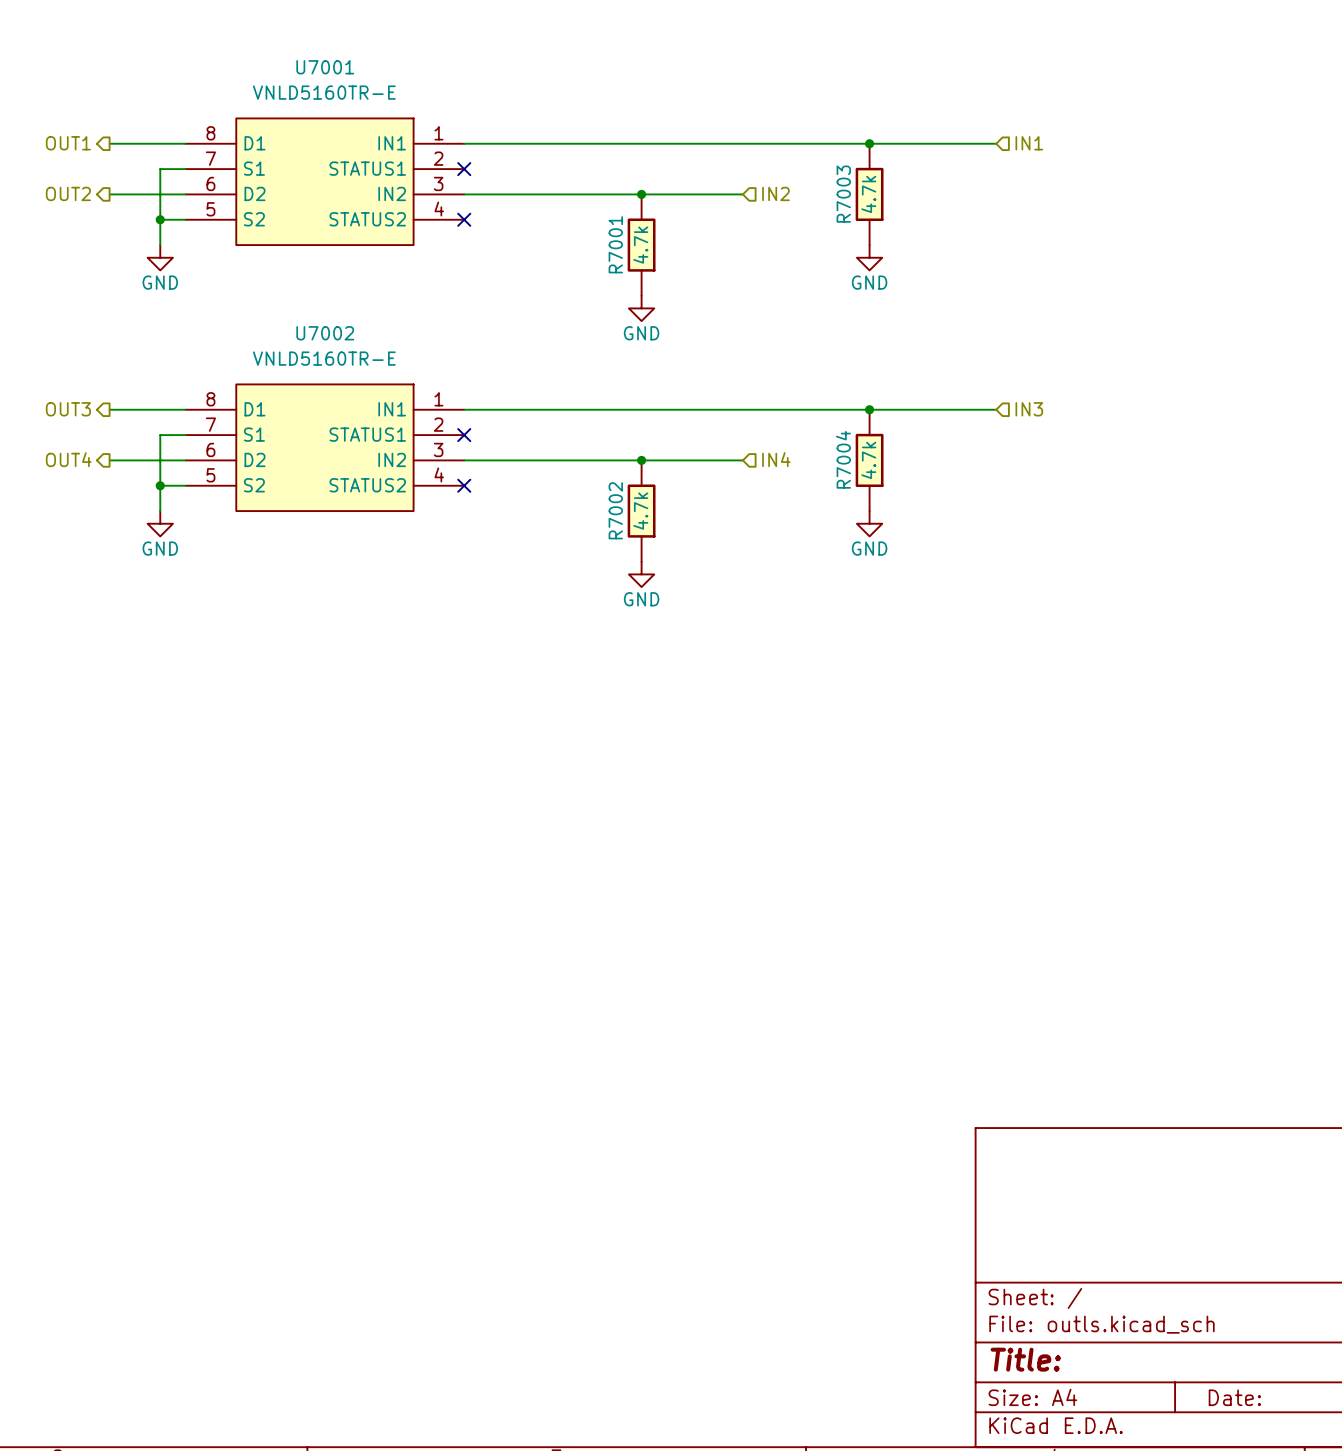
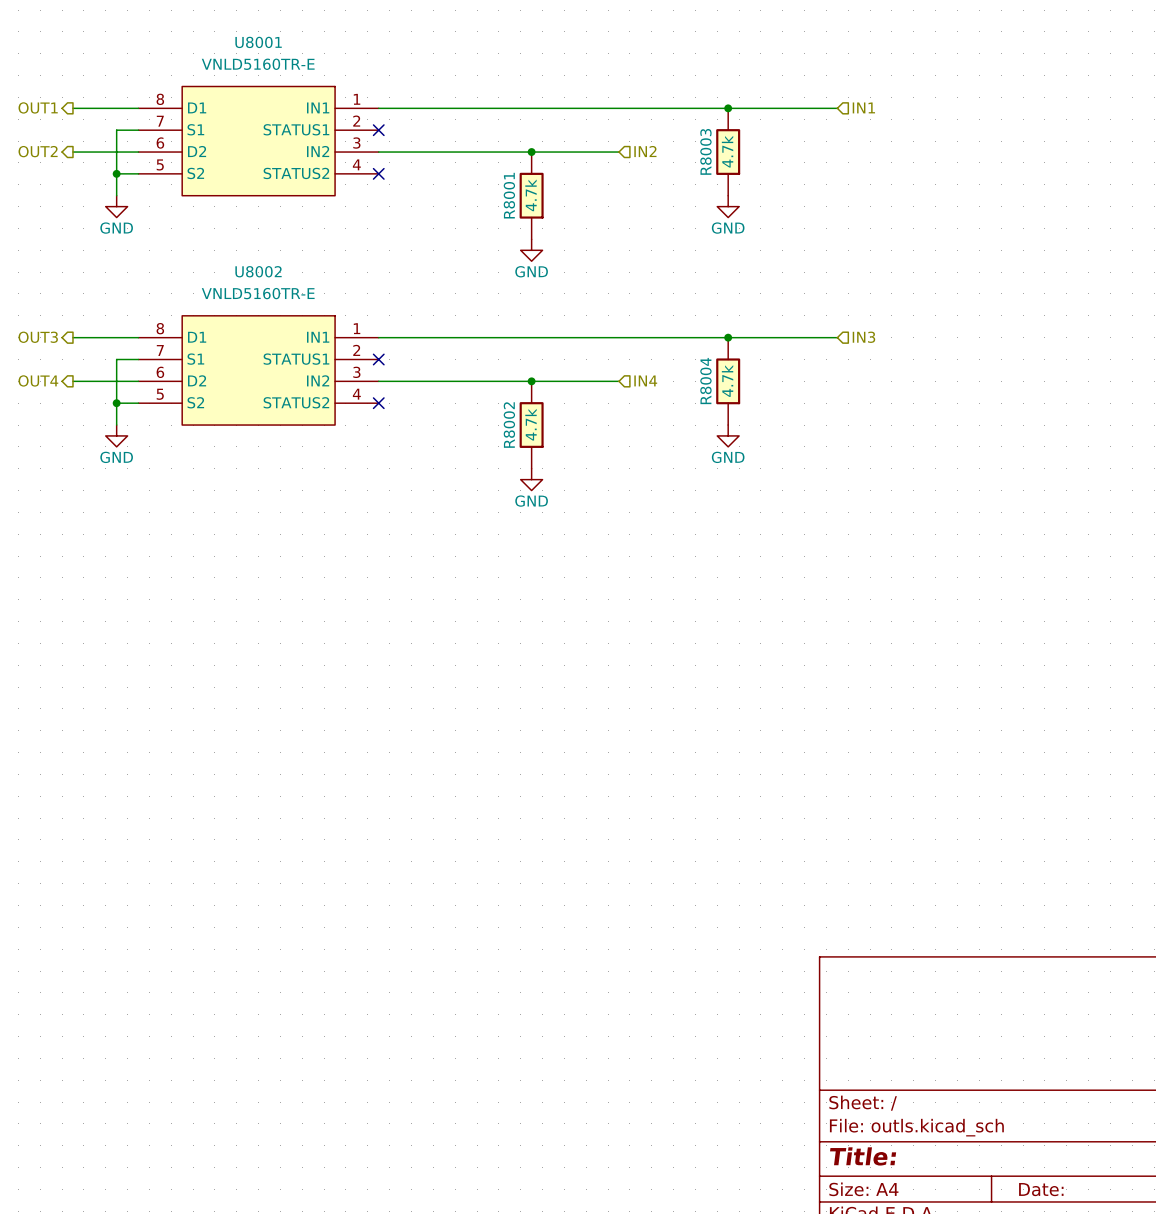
U7001 name: U7001 (325, 67) -> U8001 (258, 42)
R7003 name: R7003 (843, 194) -> R8003 (705, 151)
R7001 name: R7001 (615, 244) -> R8001 (509, 195)
U7002 name: U7002 (325, 333) -> U8002 (258, 271)
R7004 name: R7004 (843, 459) -> R8004 (705, 381)
R7002 name: R7002 (615, 510) -> R8002 (509, 425)

